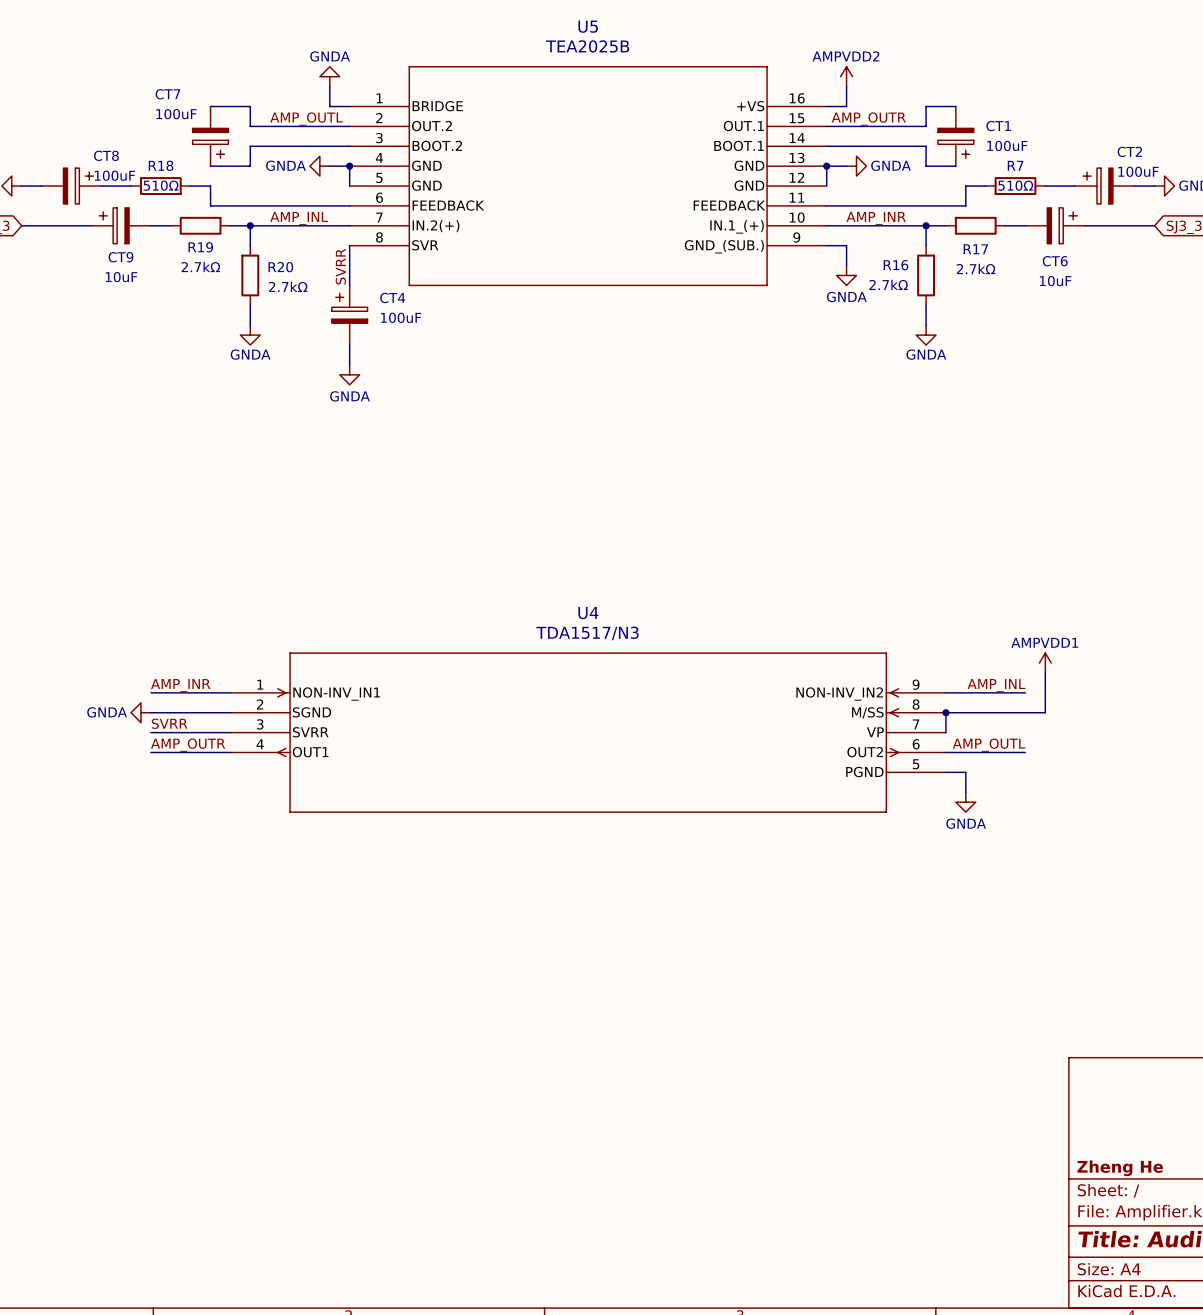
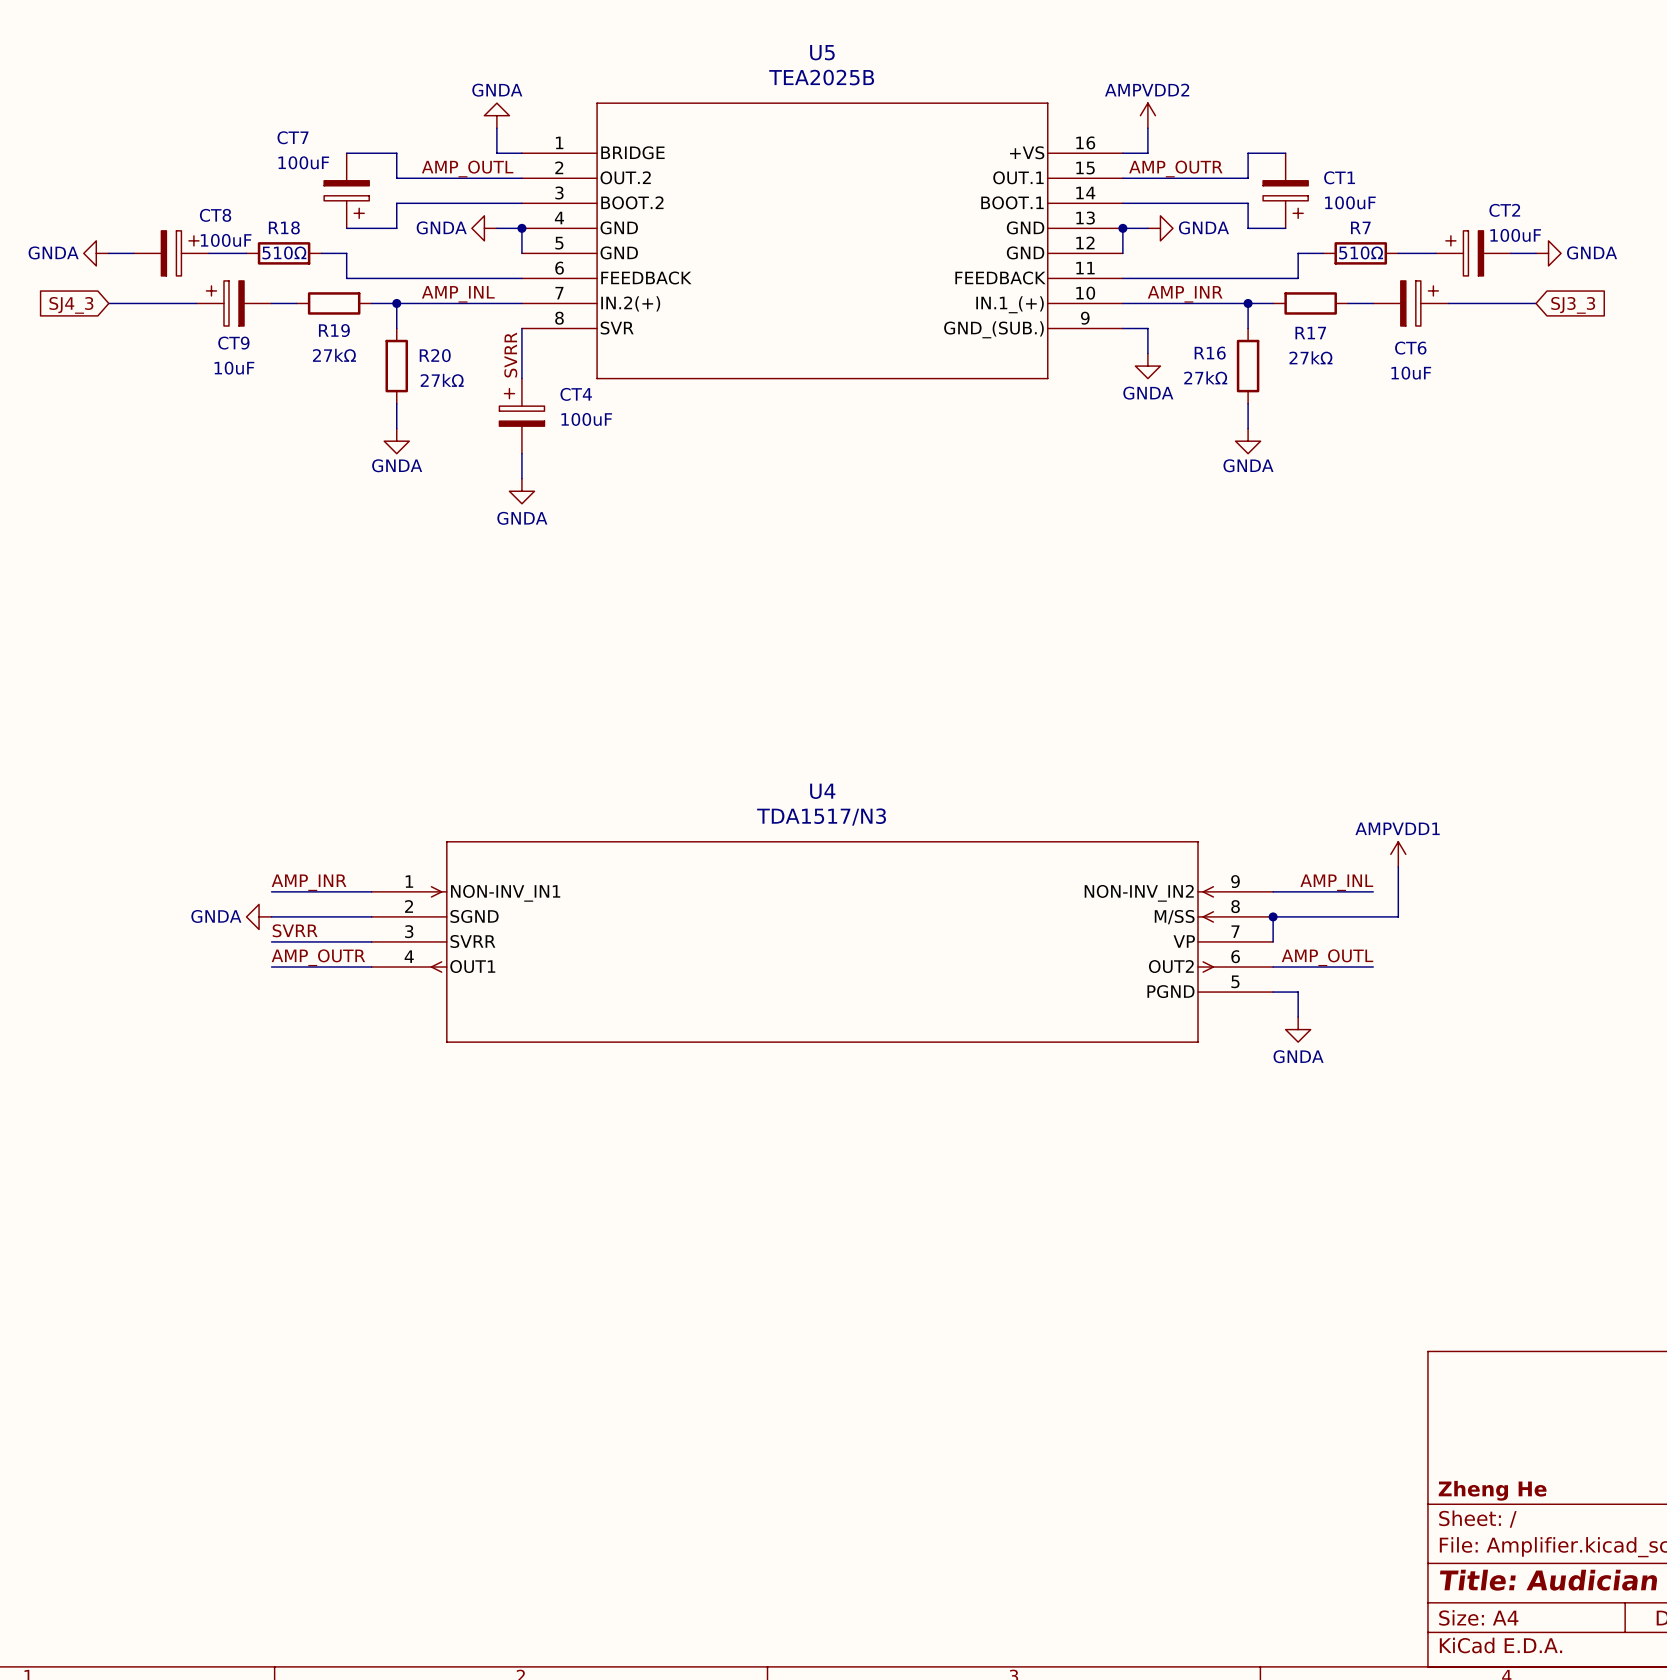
R19 value: 2.7kΩ (200, 266) -> 27kΩ (334, 355)
R17 value: 2.7kΩ (975, 268) -> 27kΩ (1310, 357)
R16 value: 2.7kΩ (888, 284) -> 27kΩ (1205, 377)
R20 value: 2.7kΩ (288, 286) -> 27kΩ (442, 380)

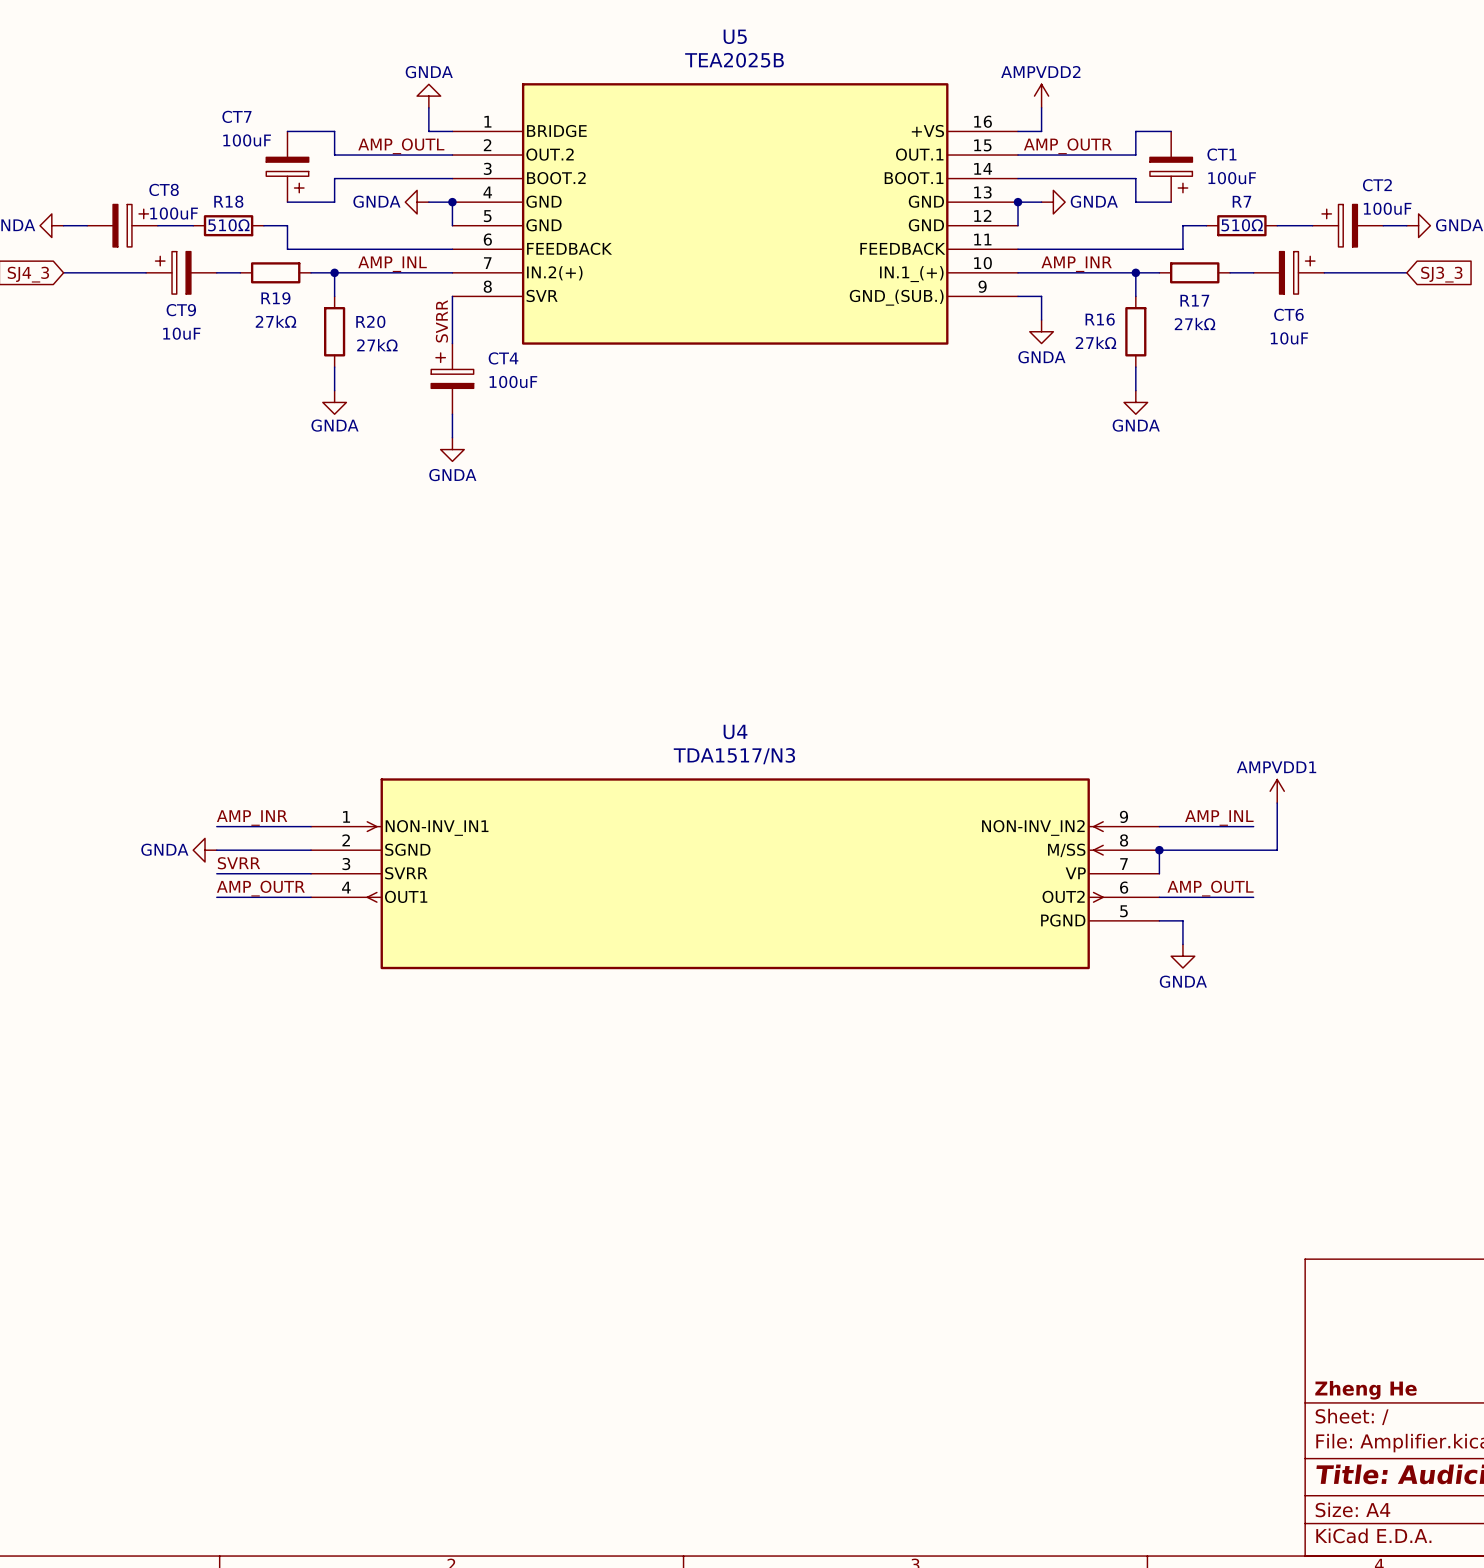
U5 symbol: [521, 102, 1123, 380] -> [452, 83, 1019, 345]
U4 symbol: [371, 841, 1274, 1043] -> [311, 778, 1160, 970]

